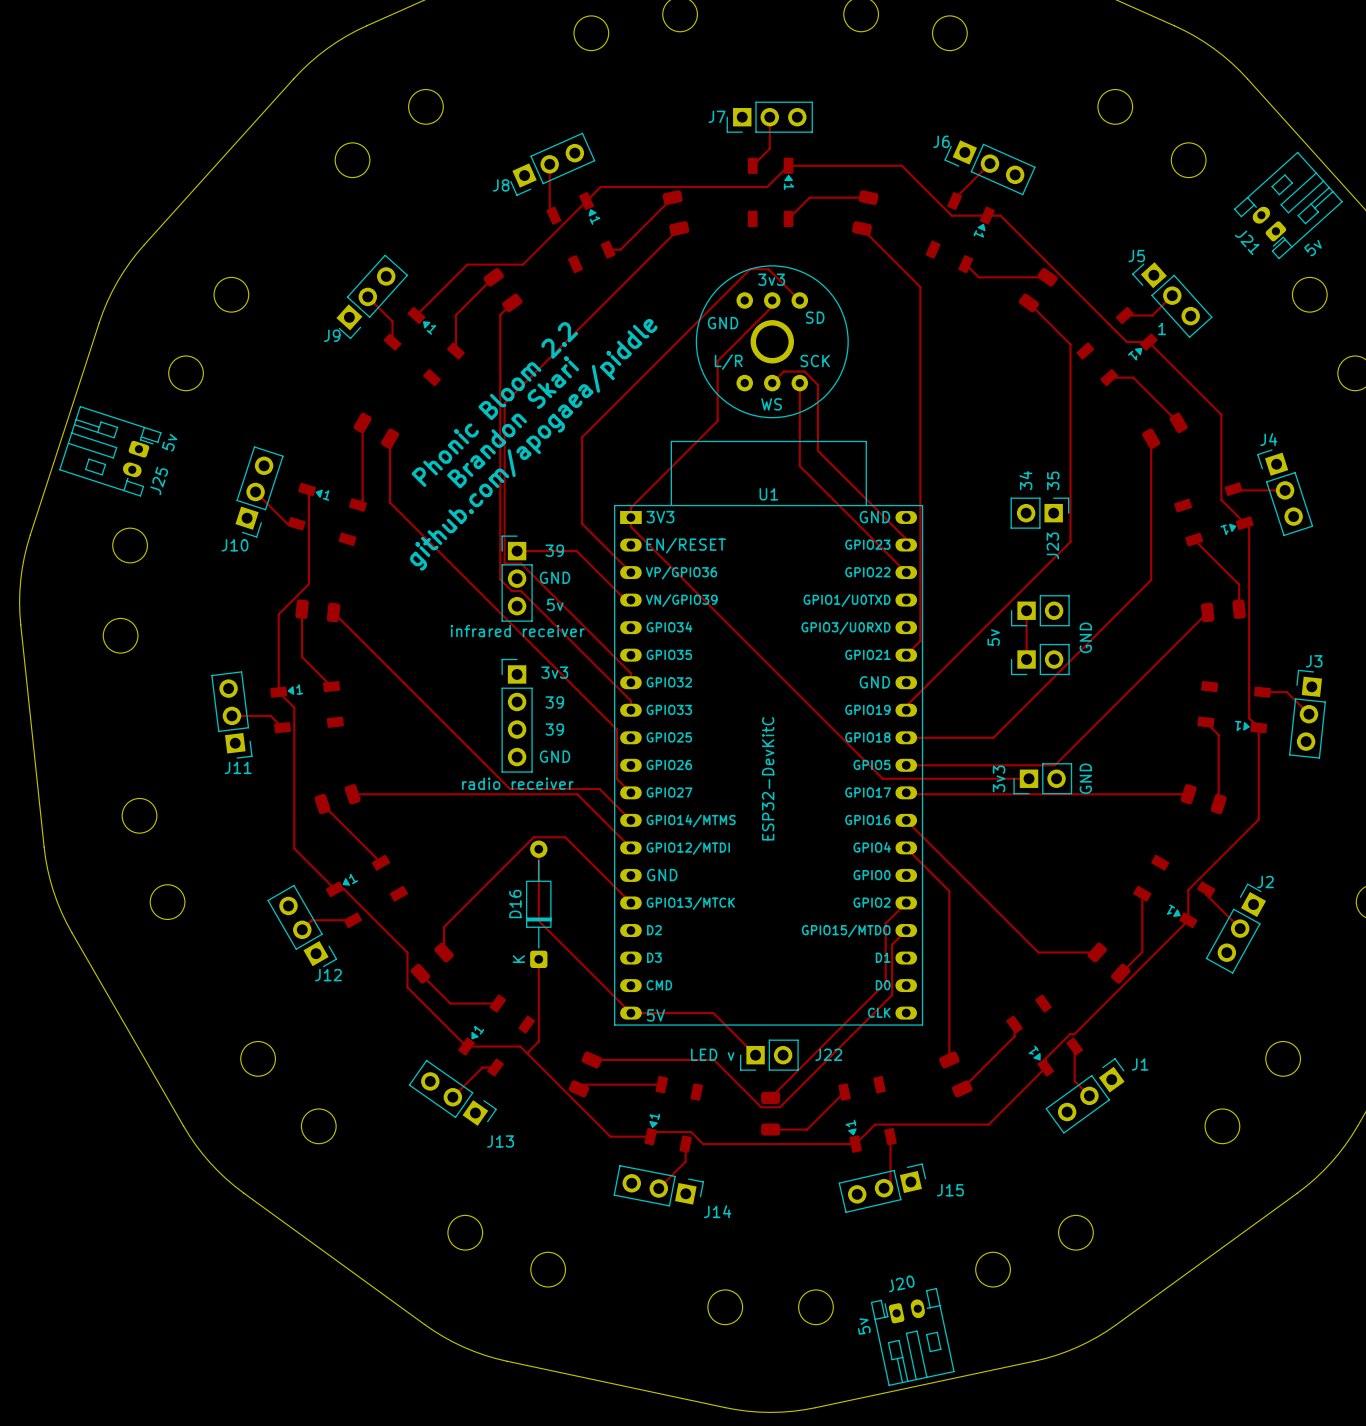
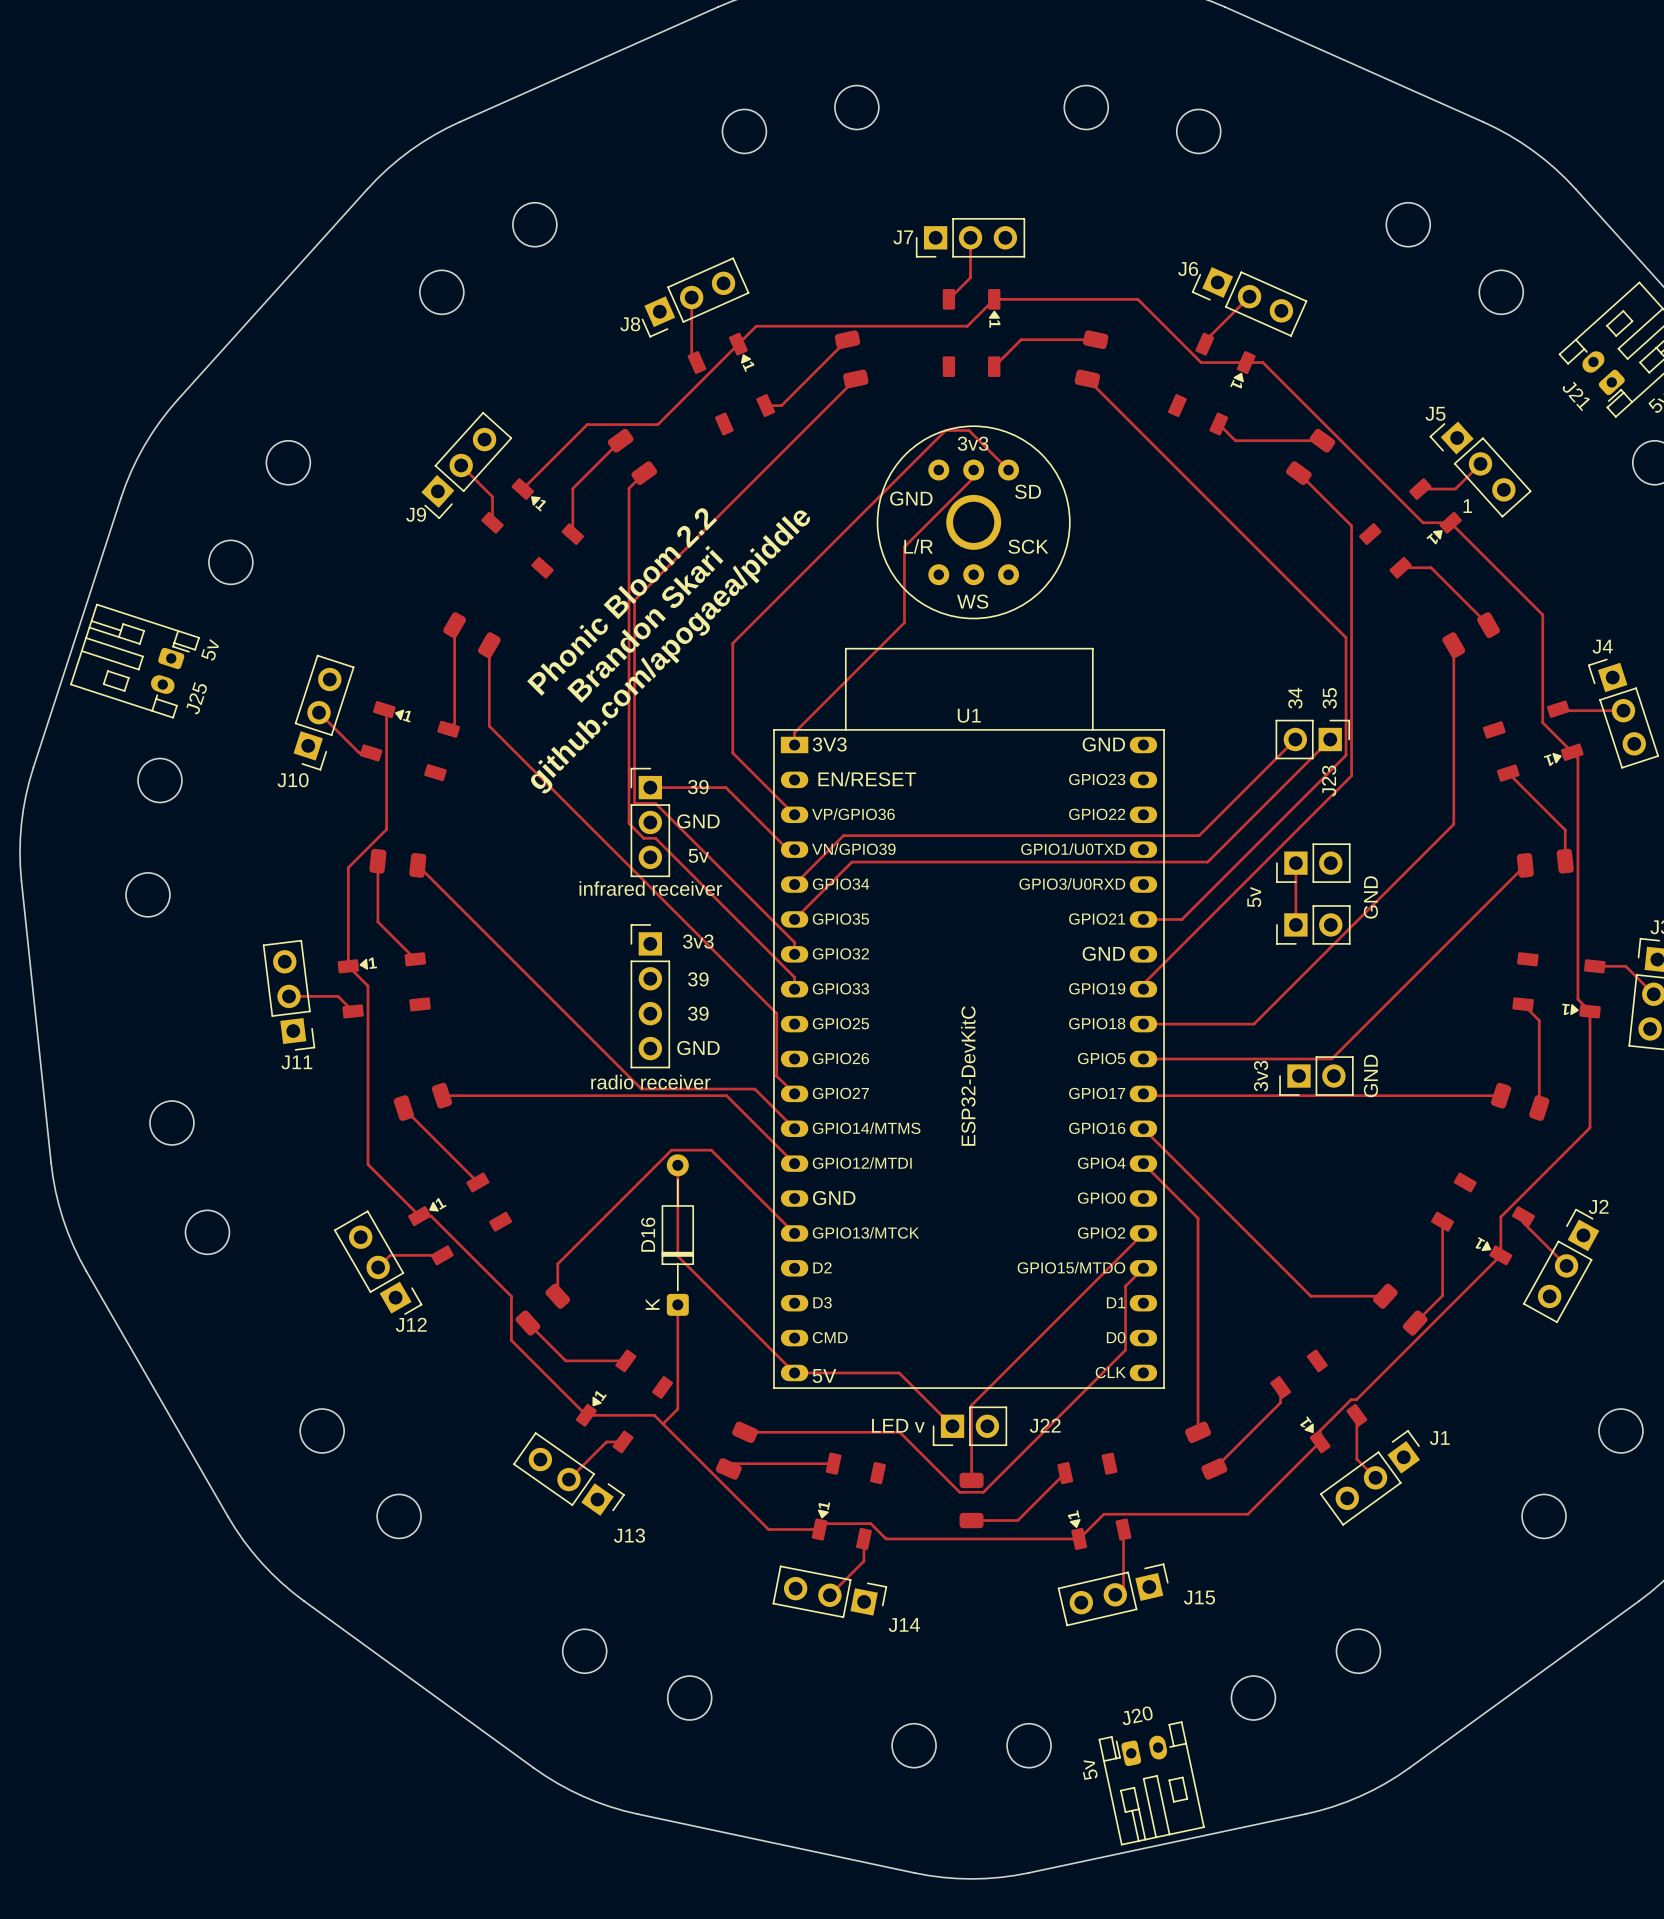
track: (920, 286) (920, 641) (906, 655) -> (1161, 452) (1346, 637) (1346, 755) (1181, 919) (1143, 919)
track: (772, 383) (783, 371) (804, 371) (817, 384) (817, 450) (906, 539) (906, 545) -> none
track: (799, 383) (799, 466) (906, 572) -> none
track: none -> (1295, 739) (1199, 835) (843, 835) (794, 884)
track: none -> (1330, 739) (1207, 862) (851, 862) (794, 919)
track: (630, 517) (630, 526) (882, 778) (1029, 778) -> none
track: (885, 923) (885, 982) (770, 1097) -> (1117, 1259) (971, 1405) (971, 1480)

